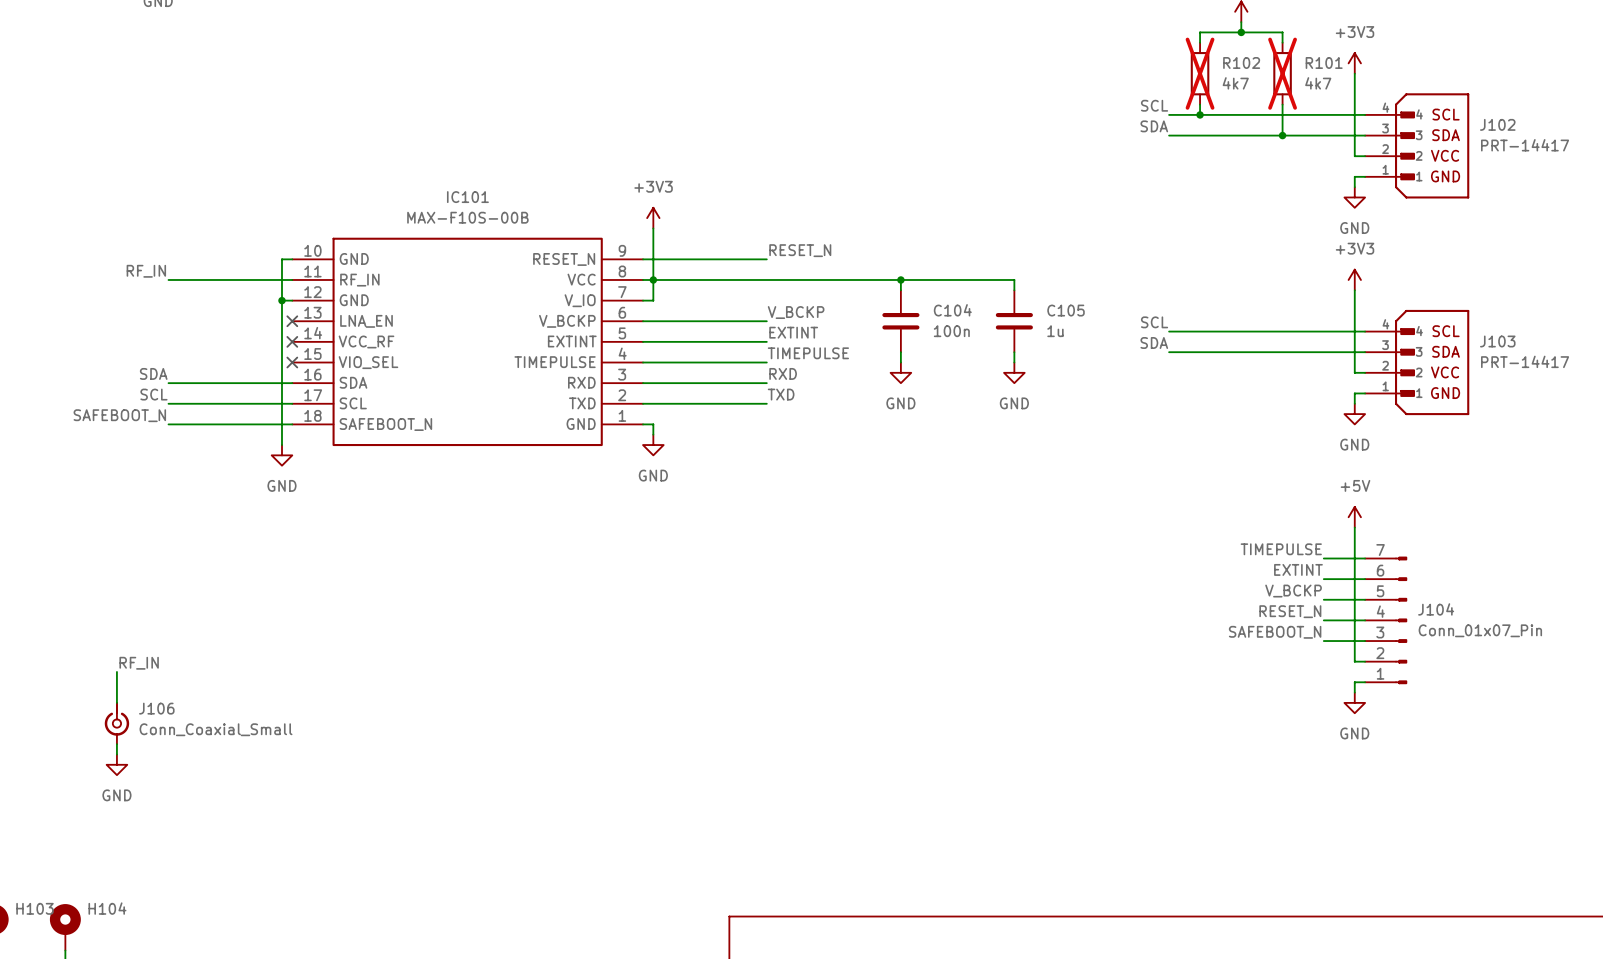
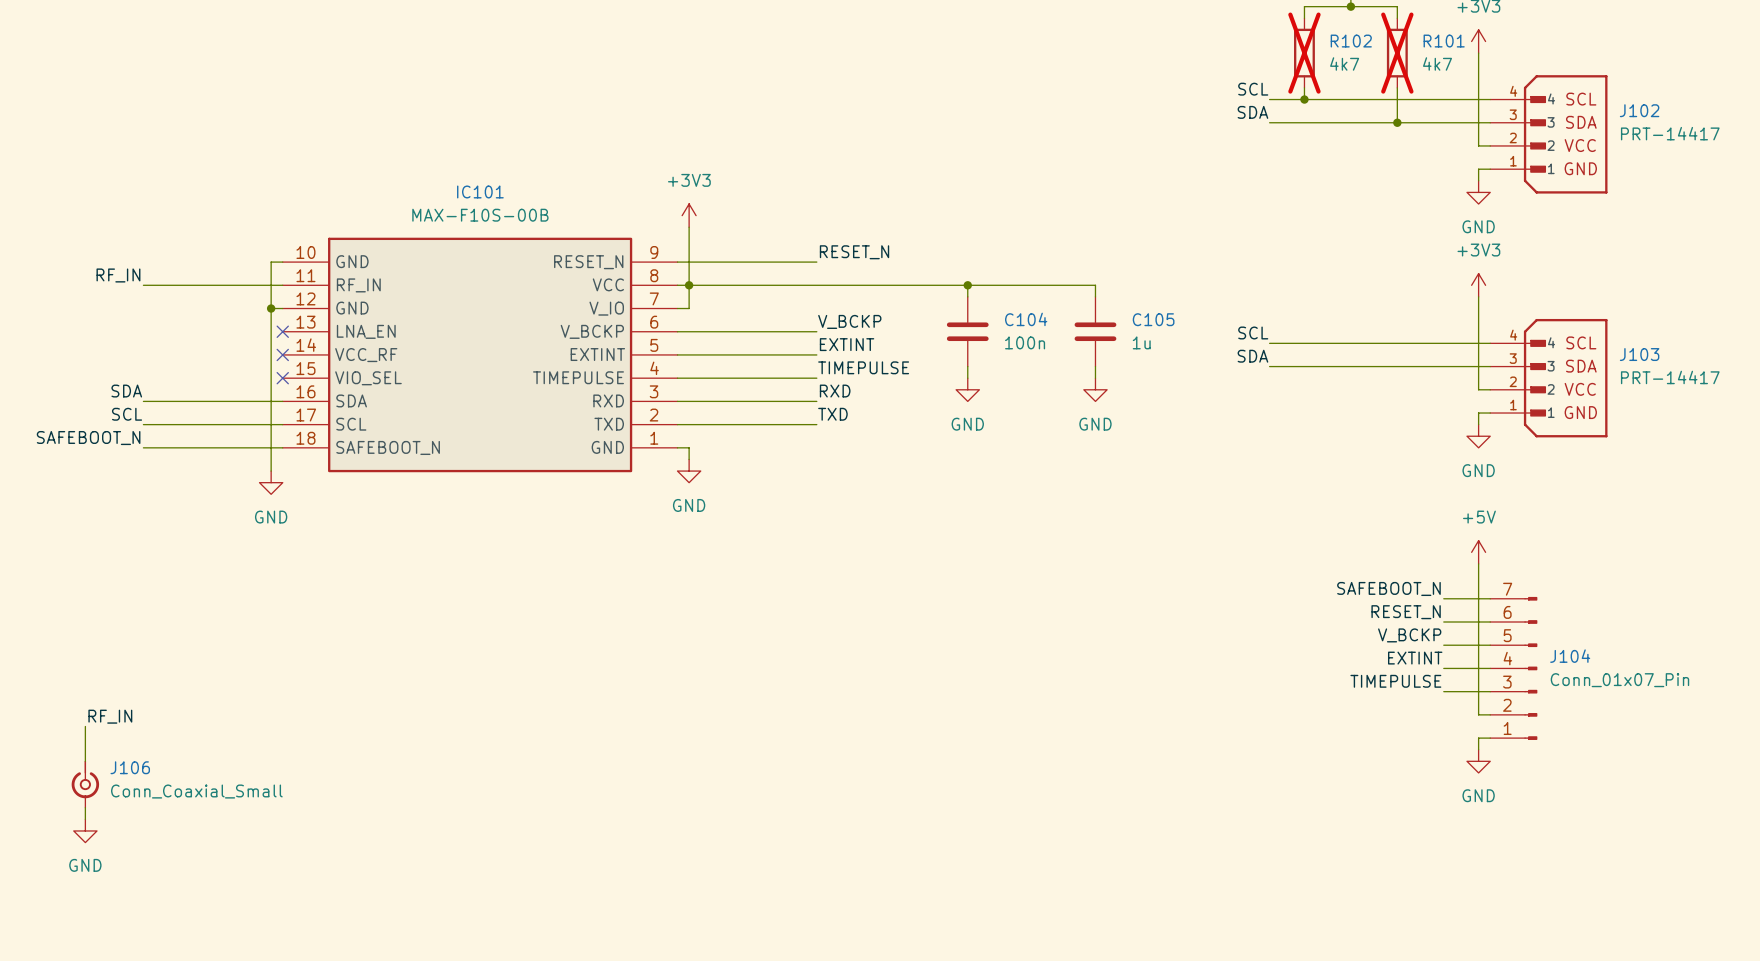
label: TIMEPULSE (1281, 549) -> SAFEBOOT_N (1388, 588)
label: EXTINT (1298, 569) -> RESET_N (1406, 612)
label: RESET_N (1290, 611) -> EXTINT (1415, 658)
label: SAFEBOOT_N (1275, 632) -> TIMEPULSE (1395, 681)

